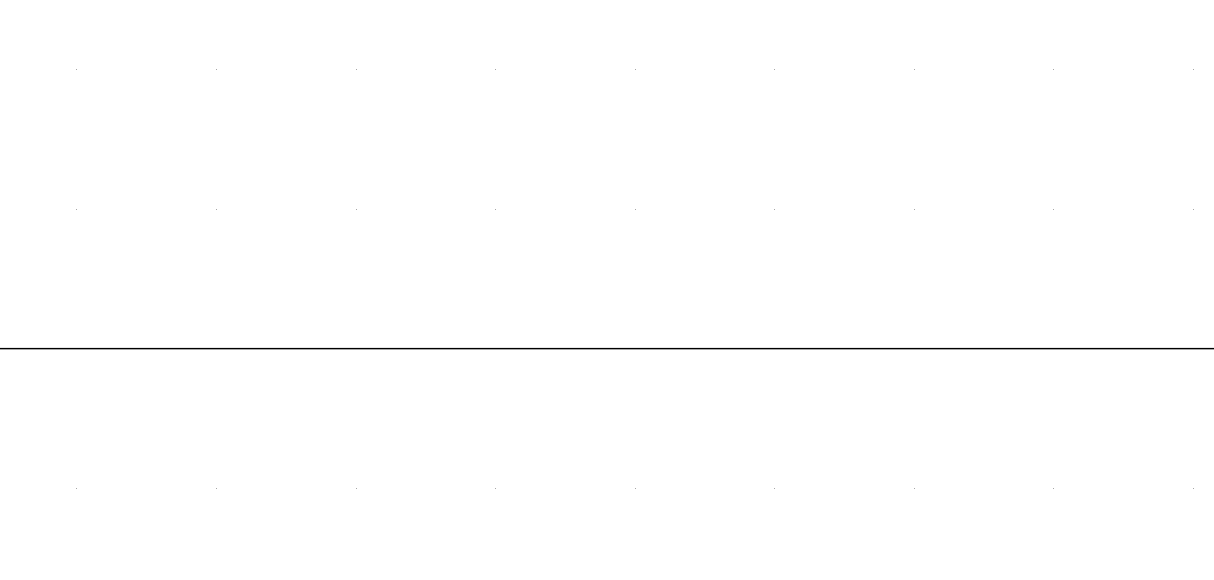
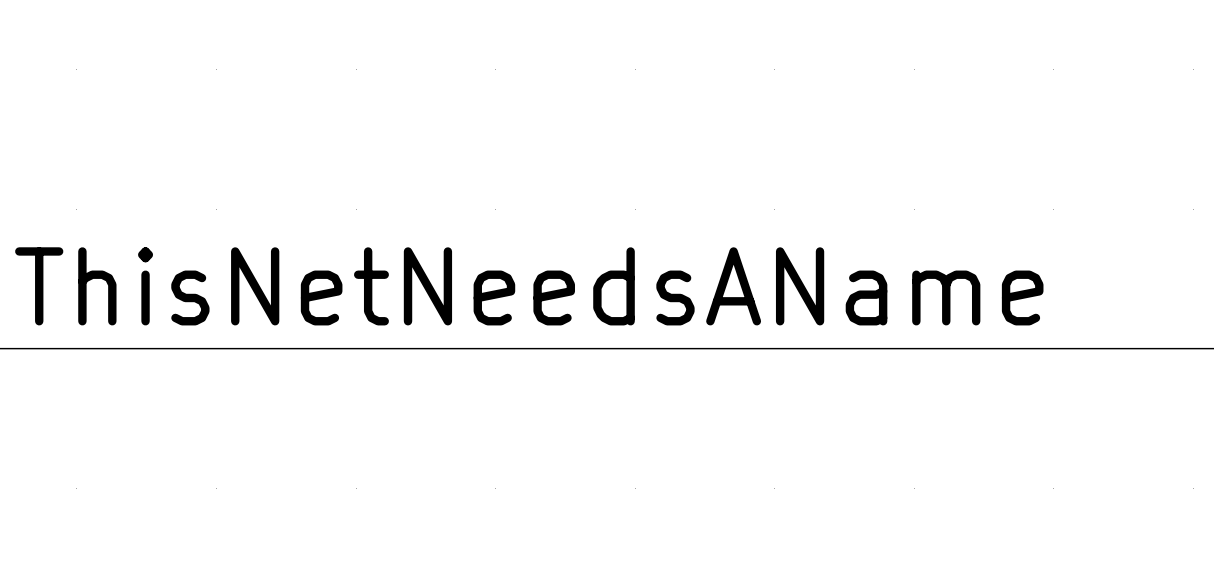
label: none -> ThisNetNeedsAName (529, 286)

